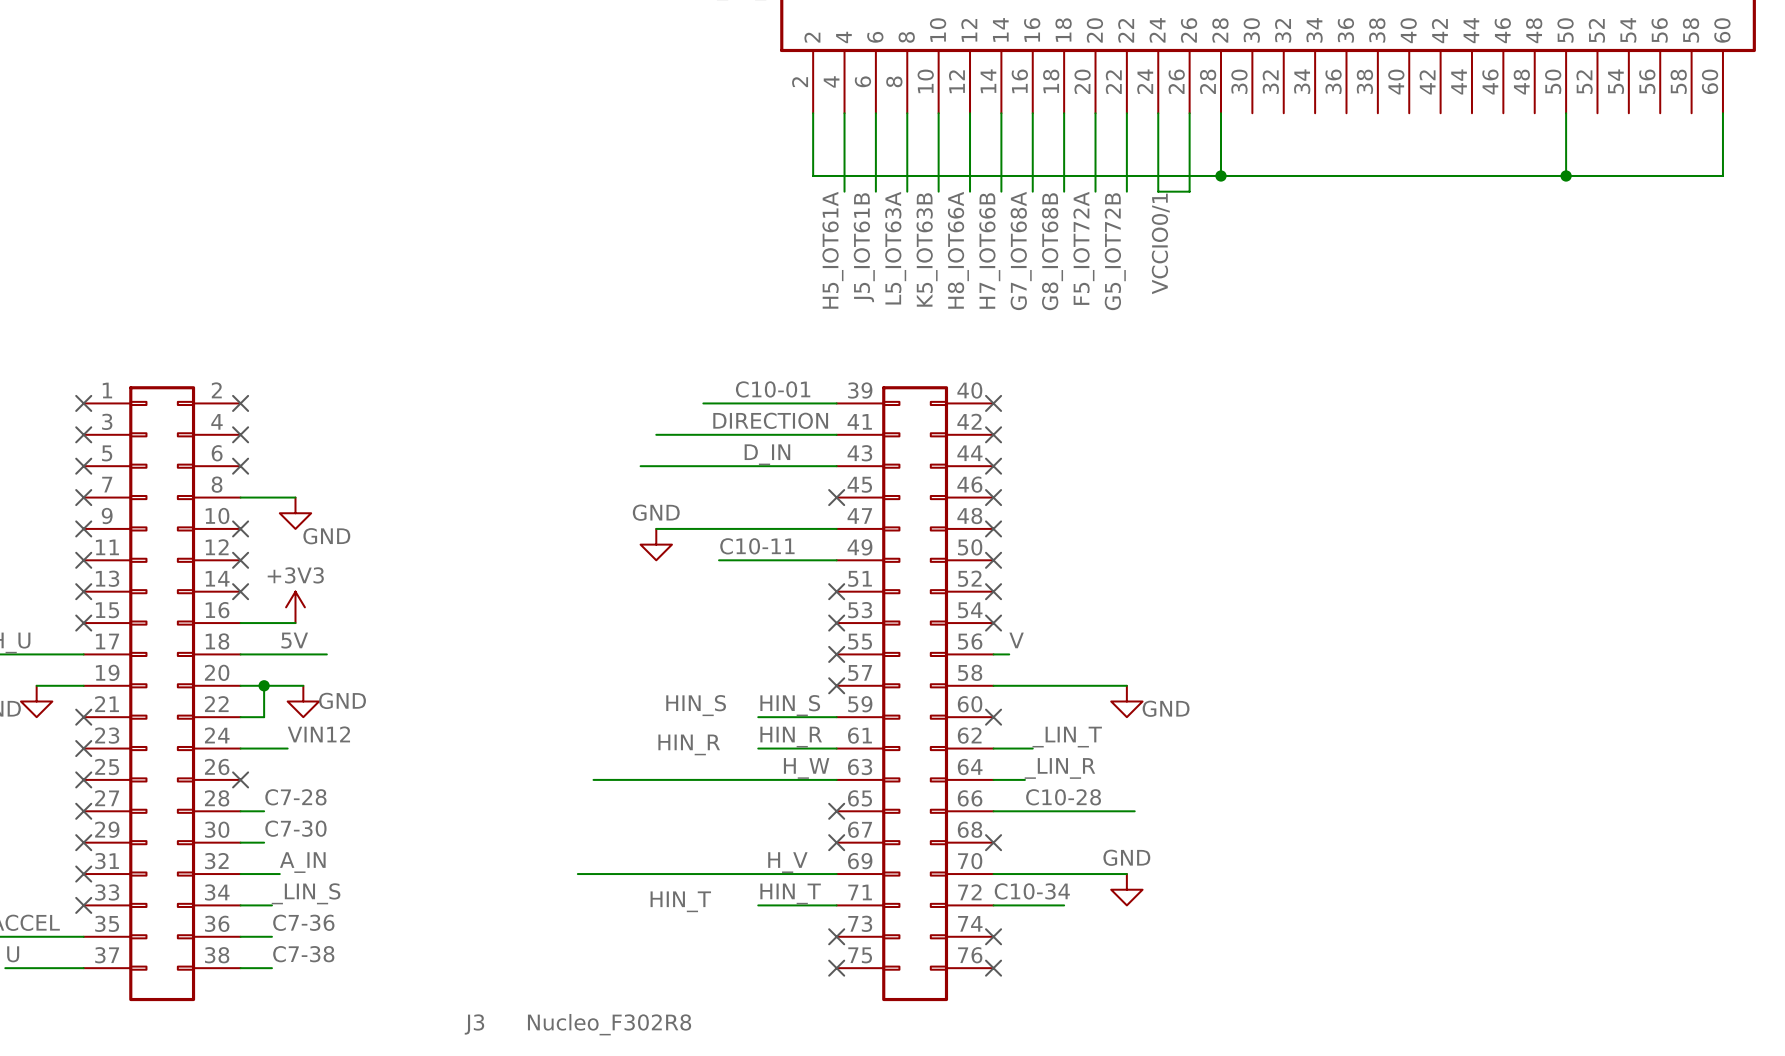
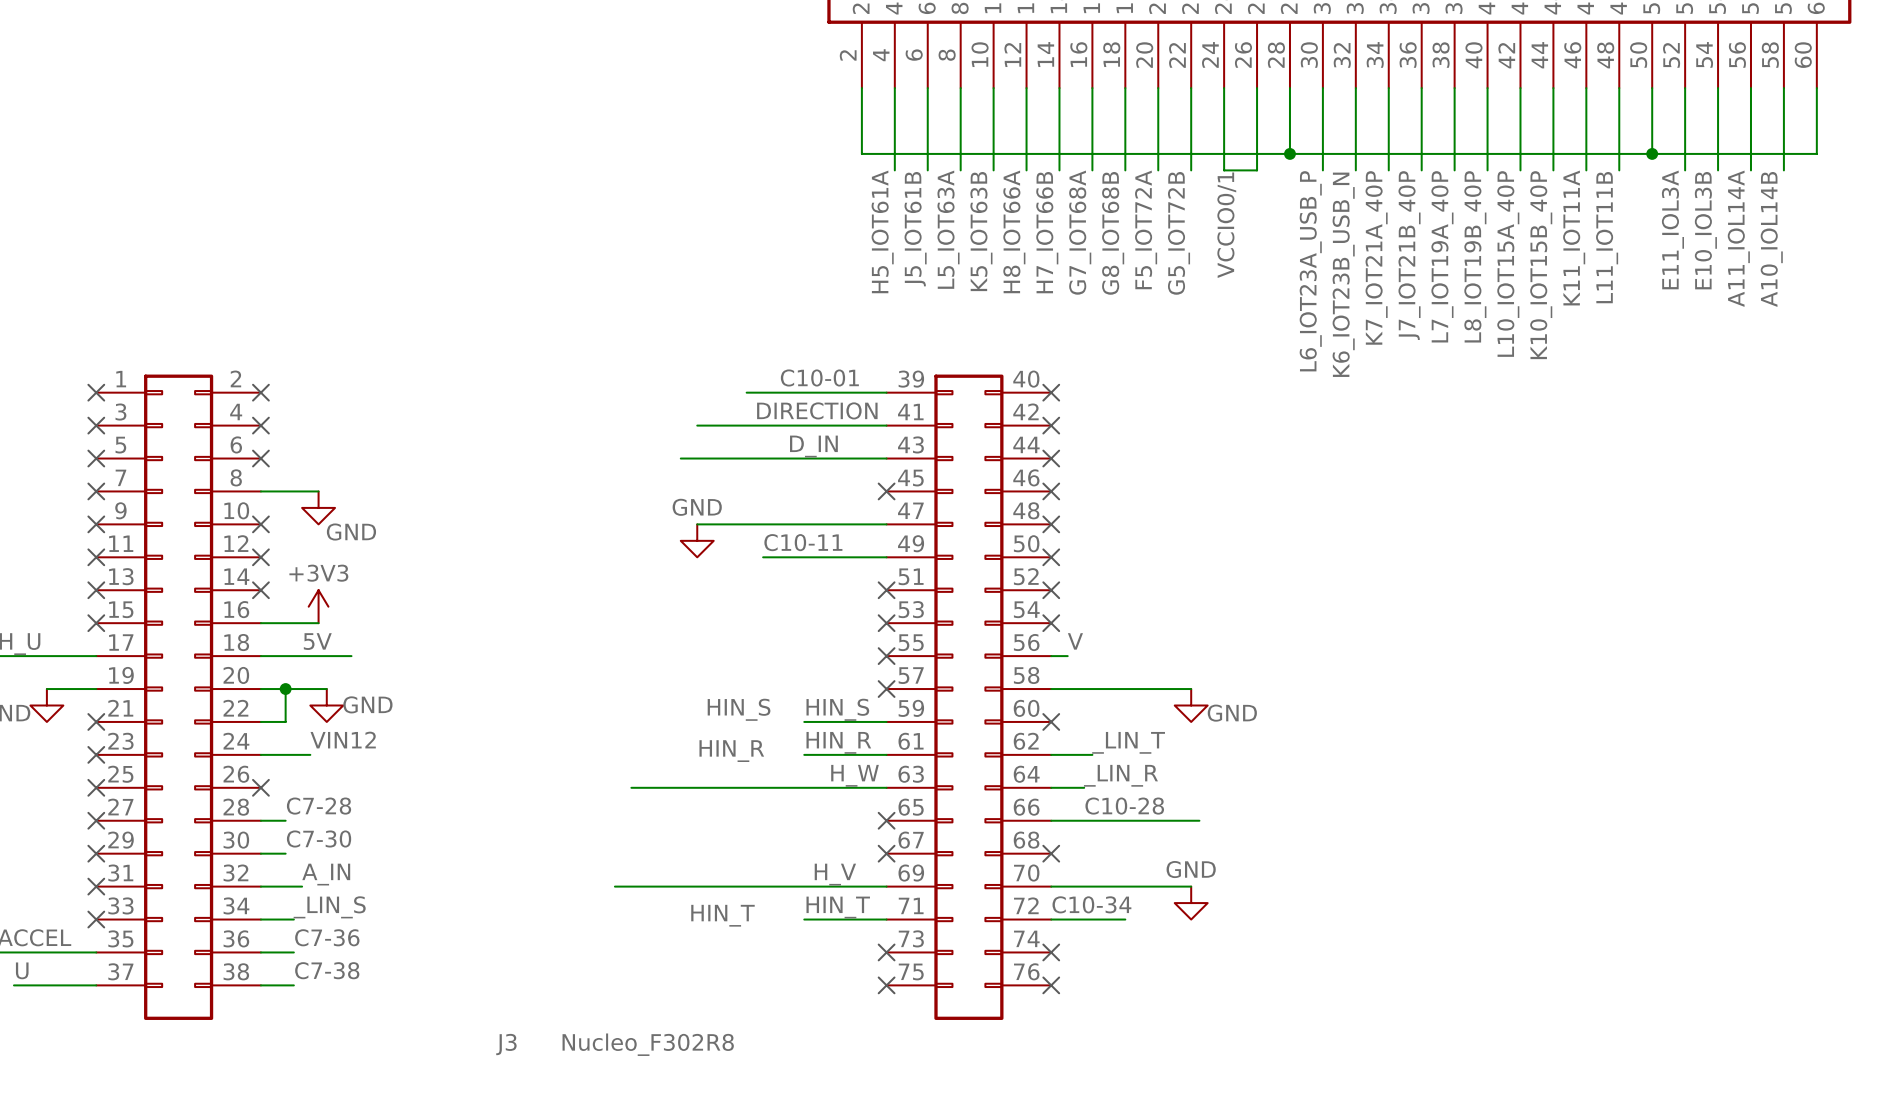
wire: none -> (1322, 88) (1322, 170)
wire: none -> (1355, 88) (1355, 170)
wire: none -> (1388, 88) (1388, 170)
wire: none -> (1421, 88) (1421, 170)
wire: none -> (1454, 88) (1454, 170)
wire: none -> (1487, 88) (1487, 170)
wire: none -> (1520, 88) (1520, 170)
wire: none -> (1553, 88) (1553, 170)
wire: none -> (1586, 88) (1586, 170)
wire: none -> (1619, 88) (1619, 170)
wire: none -> (1685, 88) (1685, 170)
wire: none -> (1718, 88) (1718, 170)
wire: none -> (1750, 88) (1750, 170)
wire: none -> (1783, 88) (1783, 170)
label: none -> E11_IOL3A (1672, 229)
label: none -> E10_IOL3B (1705, 230)
label: none -> L11_IOT11B (1607, 237)
label: none -> K11_IOT11A (1574, 238)
label: none -> A11_IOL14A (1738, 238)
label: none -> A10_IOL14B (1771, 239)
label: none -> J7_IOT21B_40P (1409, 255)
label: none -> L7_IOT19A_40P (1442, 256)
label: none -> L8_IOT19B_40P (1475, 256)
label: none -> K7_IOT21A_40P (1376, 257)
label: none -> L10_IOT15A_40P (1508, 264)
label: none -> K10_IOT15B_40P (1541, 265)
label: none -> L6_IOT23A_USB_P (1310, 271)
label: none -> K6_IOT23B_USB_N (1343, 274)

